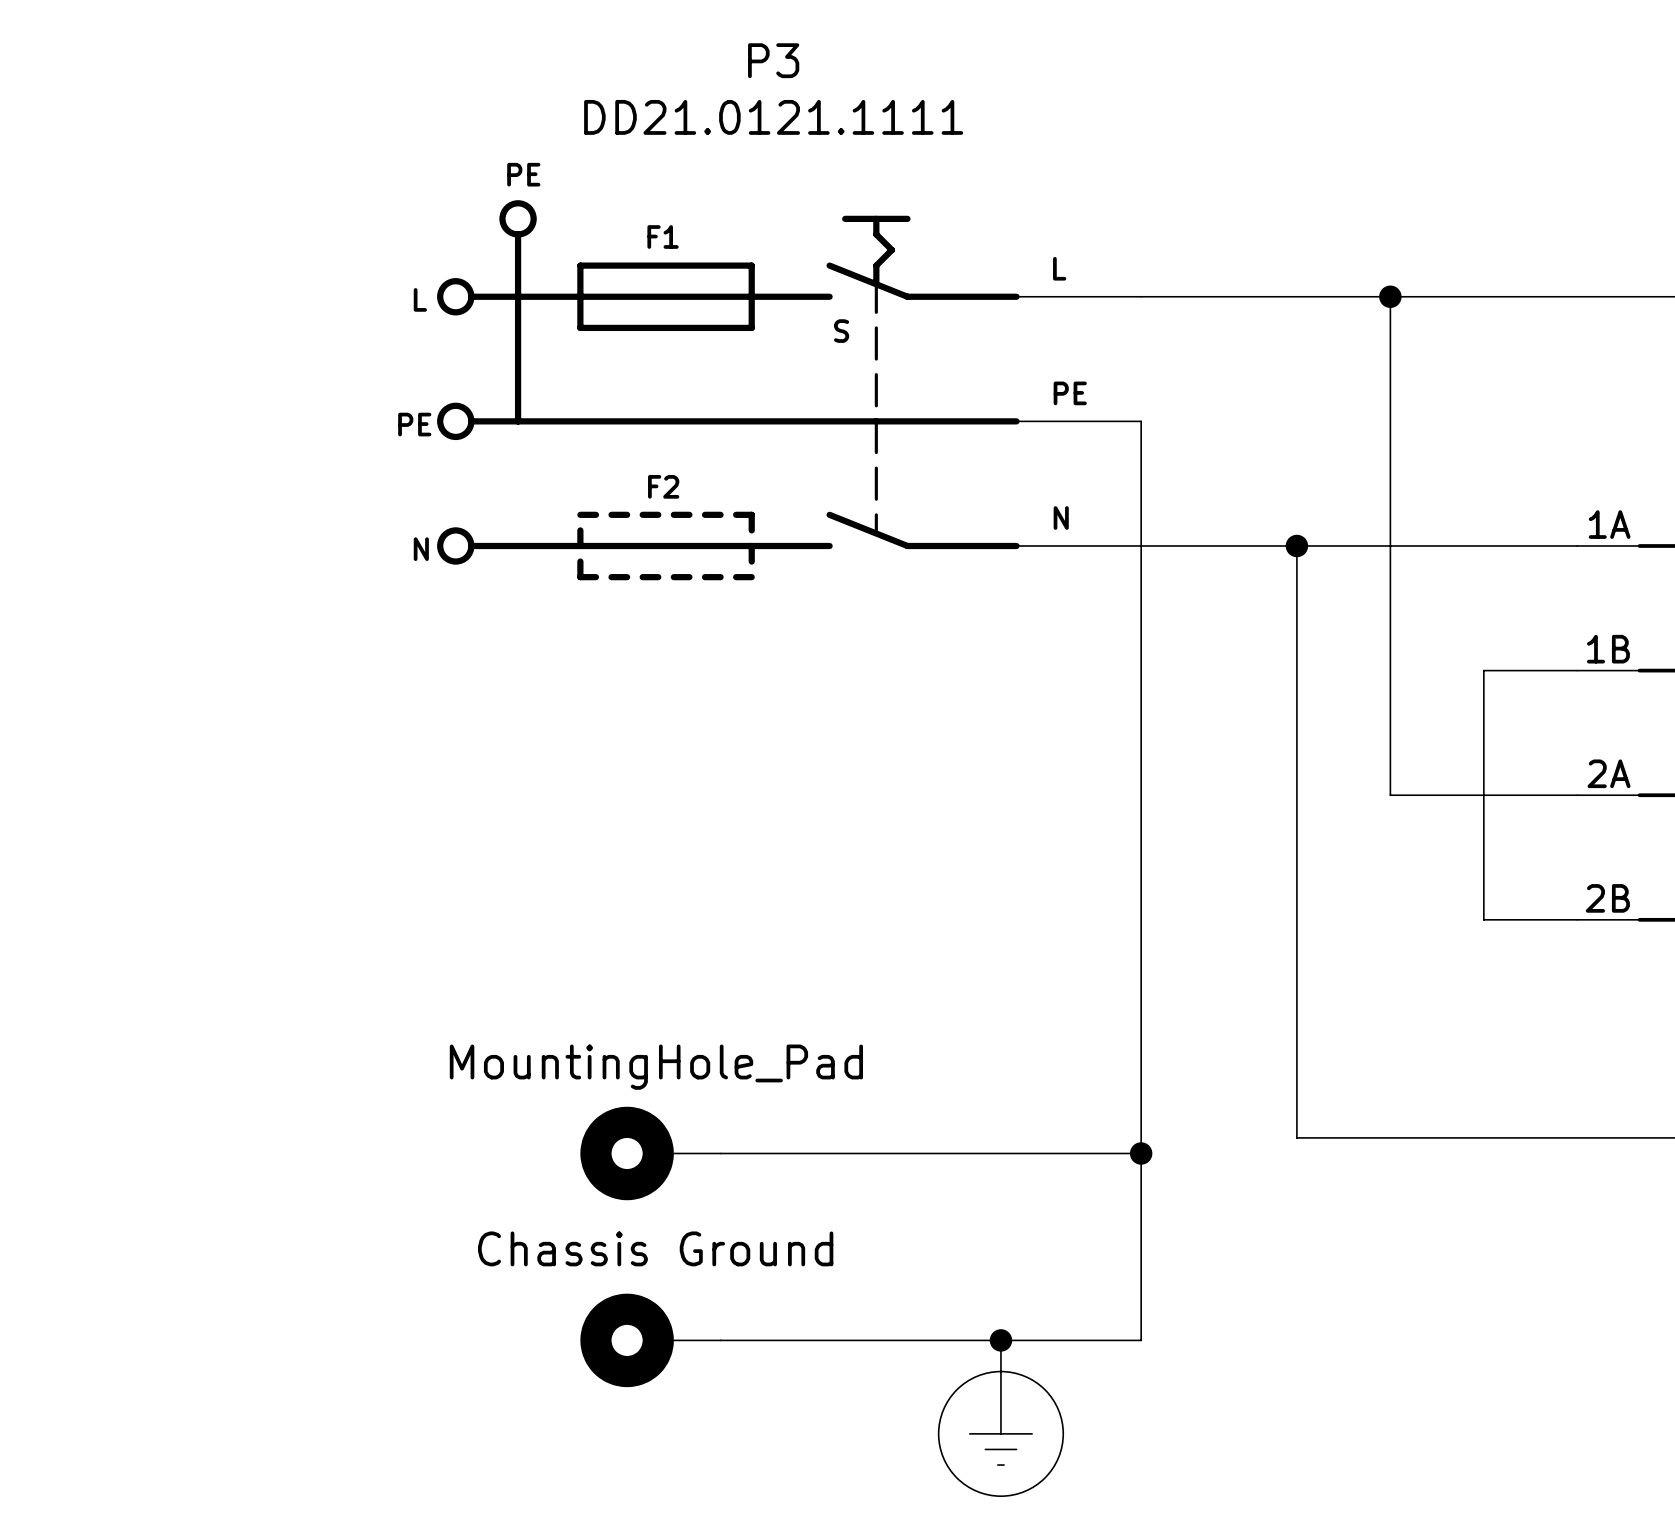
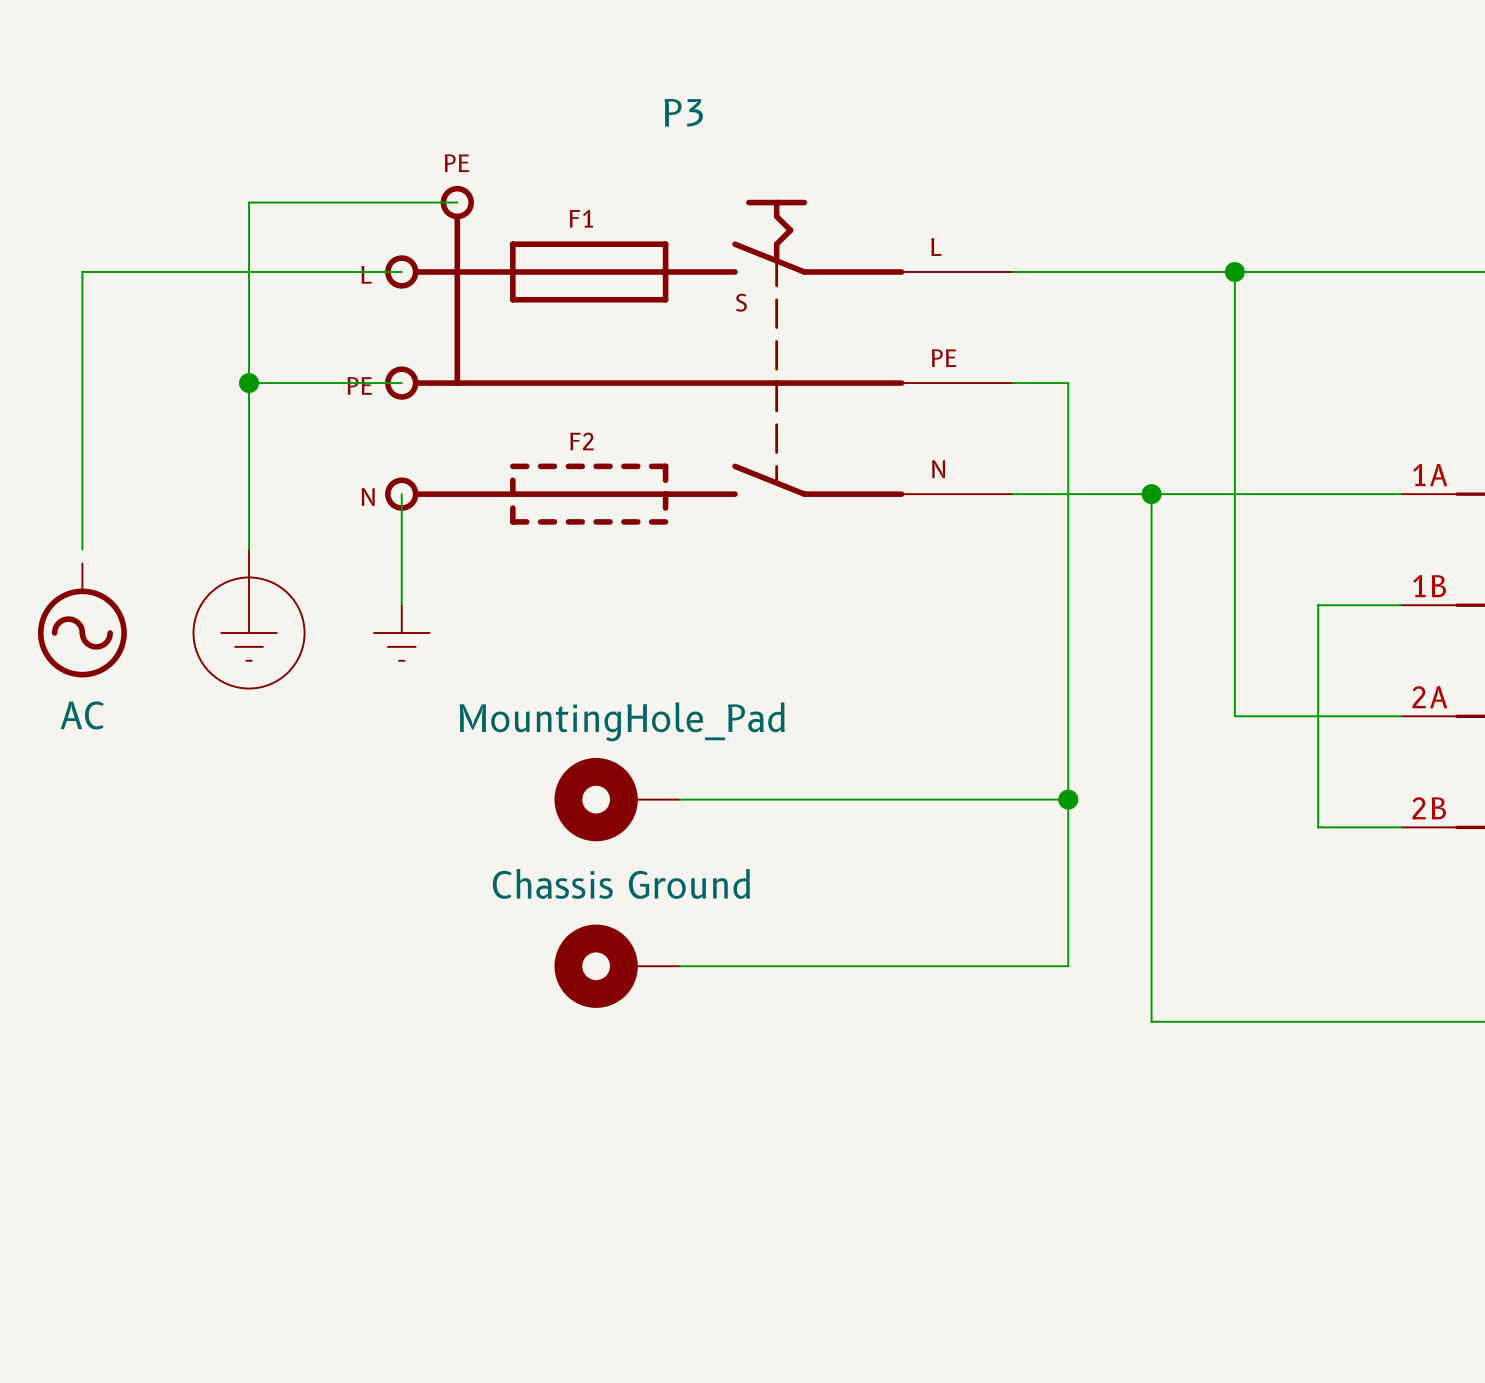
P3 name position: P3 (773, 60) -> P3 (683, 112)
P3 value: DD21.0121.1111 (773, 117) -> none
wire: none -> (457, 202) (249, 202) (249, 549)
wire: none -> (401, 271) (82, 271) (82, 549)
wire: none -> (249, 383) (401, 383)
junction: none -> (249, 383)
wire: (1141, 421) (1141, 1340) (720, 1340) -> (1012, 383) (1068, 383) (1068, 966) (679, 966)
wire: none -> (401, 494) (401, 605)
power symbol: none -> (249, 619)
power symbol: none -> AC (82, 620)
power symbol: none -> (401, 632)
wire: none -> (679, 799) (1068, 799)
junction: none -> (1068, 799)
part position: (650, 1153) -> (616, 799)
wire: (720, 1153) (1141, 1153) -> none
junction: (1141, 1153) -> none
part position: (650, 1340) -> (616, 966)
junction: (1000, 1340) -> none
power symbol: (1000, 1418) -> none

